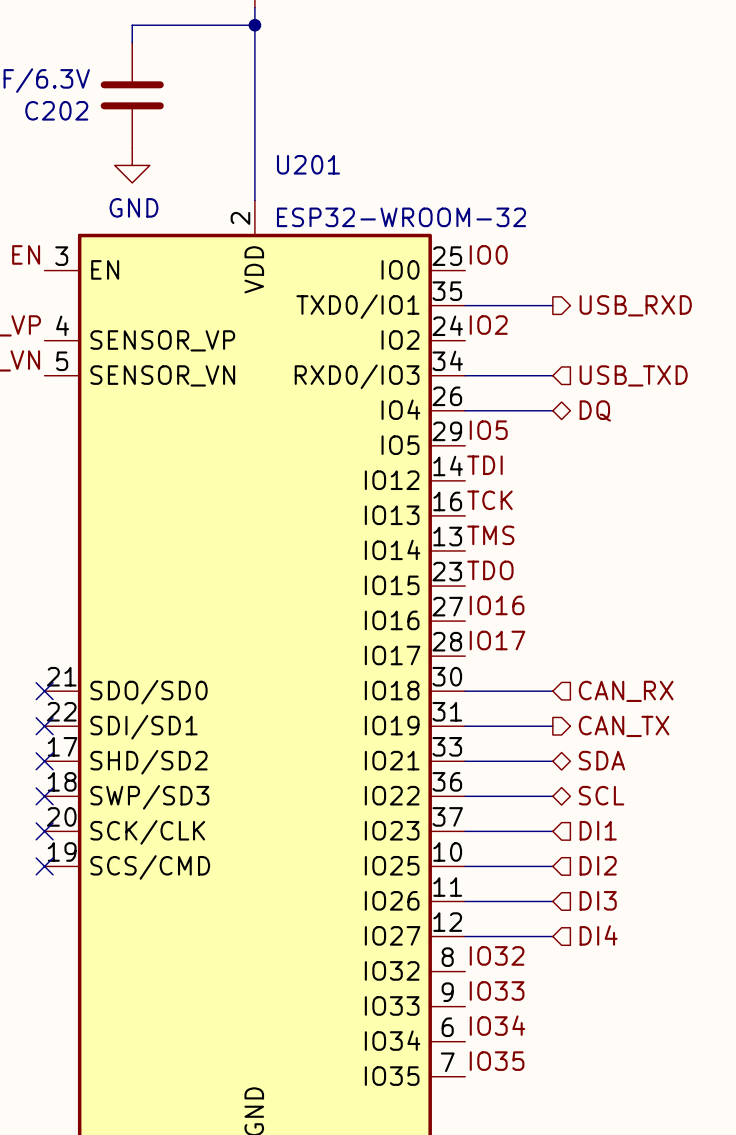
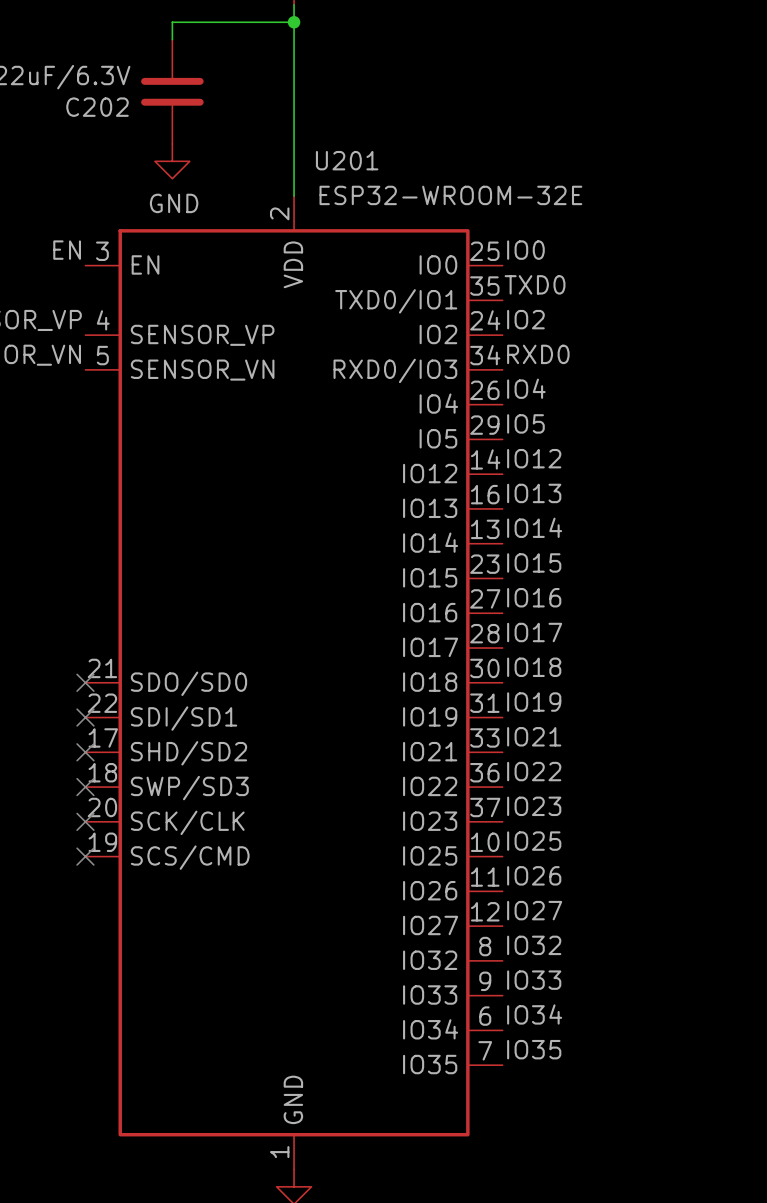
U201 value: ESP32-WROOM-32 (401, 217) -> ESP32-WROOM-32E (450, 195)
label: none -> TXD0 (535, 284)
wire: (465, 305) (552, 305) -> none
hierarchical label: USB_RXD (635, 305) -> none
label: none -> RXD0 (538, 354)
wire: (465, 375) (552, 375) -> none
hierarchical label: USB_TXD (633, 375) -> none
label: none -> IO4 (526, 388)
wire: (465, 410) (552, 410) -> none
hierarchical label: DQ (595, 410) -> none
label: TDI (484, 465) -> IO12 (534, 458)
label: TCK (489, 500) -> IO13 (534, 493)
label: TMS (490, 535) -> IO14 (534, 527)
label: TDO (490, 570) -> IO15 (534, 562)
label: none -> IO18 (534, 667)
wire: (465, 691) (552, 691) -> none
hierarchical label: CAN_RX (626, 691) -> none
label: none -> IO19 (534, 702)
wire: (465, 726) (552, 726) -> none
hierarchical label: CAN_TX (624, 726) -> none
label: none -> IO21 (534, 736)
hierarchical label: SDA (601, 760) -> none
wire: (465, 761) (552, 761) -> none
label: none -> IO22 (534, 771)
hierarchical label: SCL (601, 795) -> none
wire: (465, 796) (552, 796) -> none
label: none -> IO23 (534, 806)
hierarchical label: DI1 (598, 830) -> none
wire: (465, 831) (552, 831) -> none
label: none -> IO25 (534, 841)
hierarchical label: DI2 (598, 865) -> none
wire: (465, 866) (552, 866) -> none
label: none -> IO26 (534, 875)
hierarchical label: DI3 (598, 900) -> none
wire: (465, 901) (552, 901) -> none
label: none -> IO27 (534, 910)
hierarchical label: DI4 (598, 935) -> none
wire: (465, 936) (552, 936) -> none

